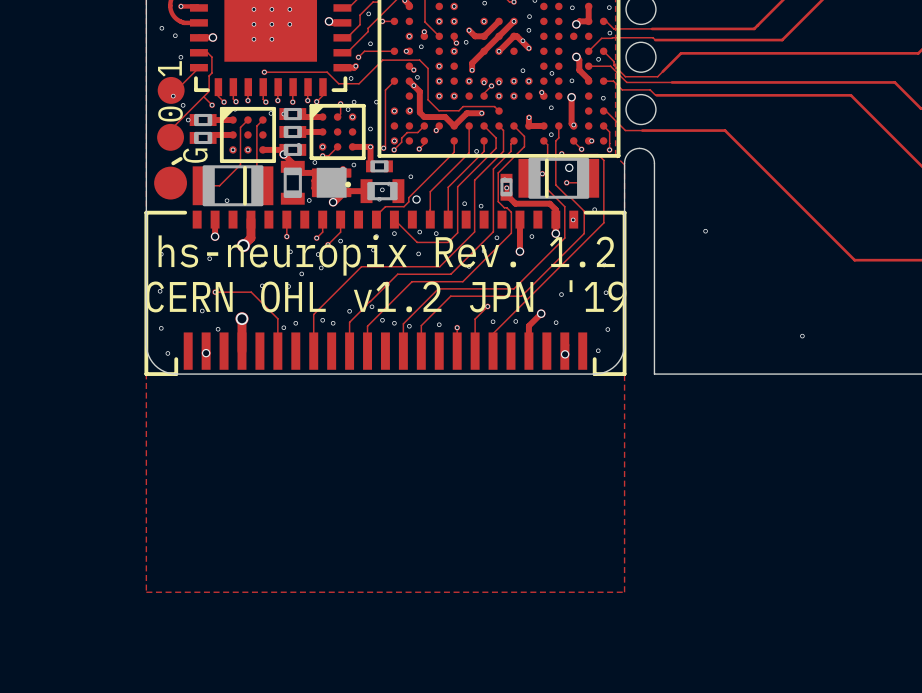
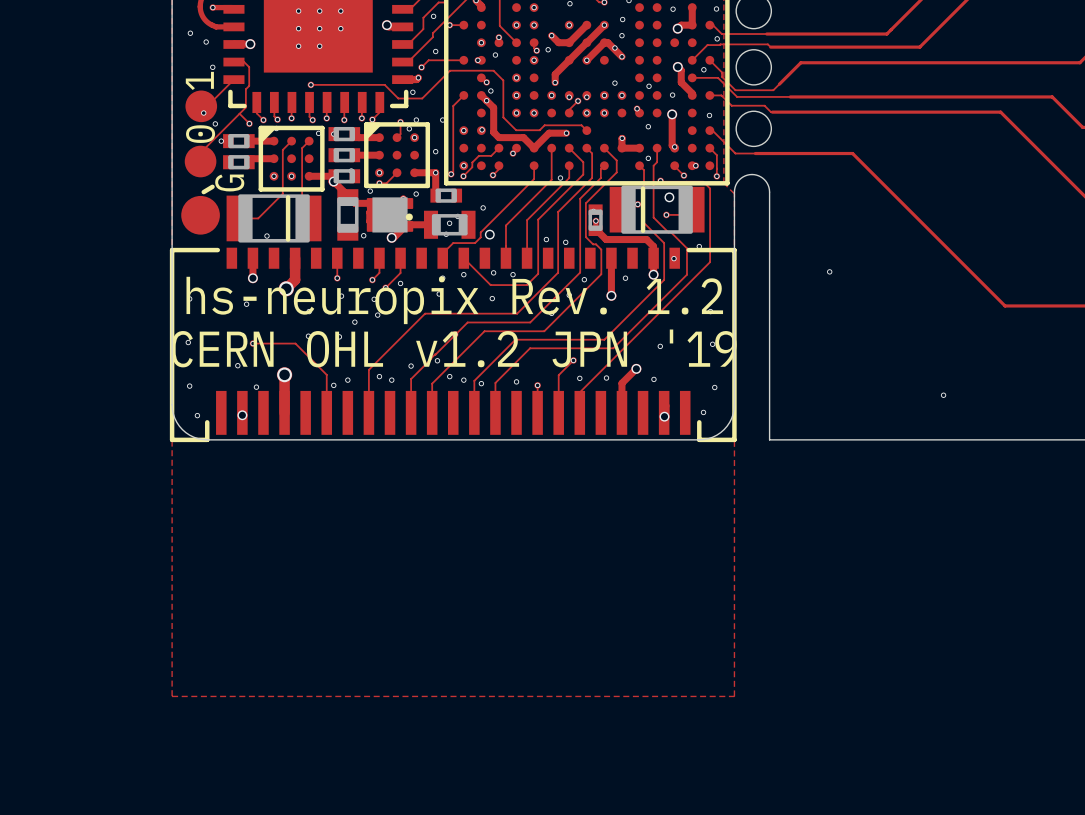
part footprint: [280, 160, 305, 205] -> [337, 189, 359, 241]

